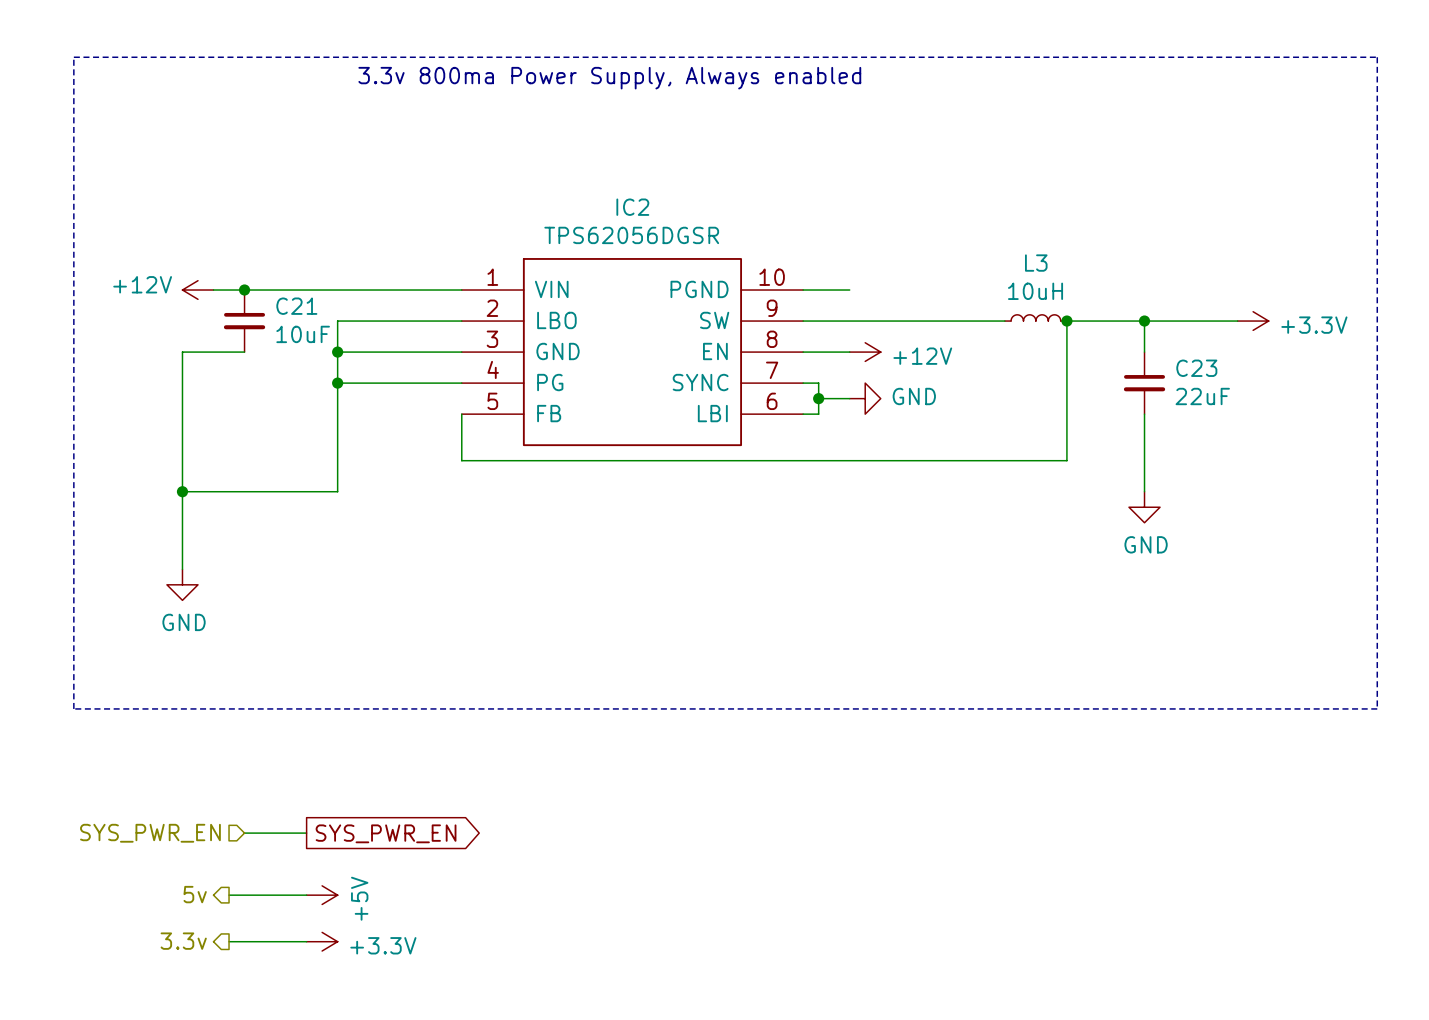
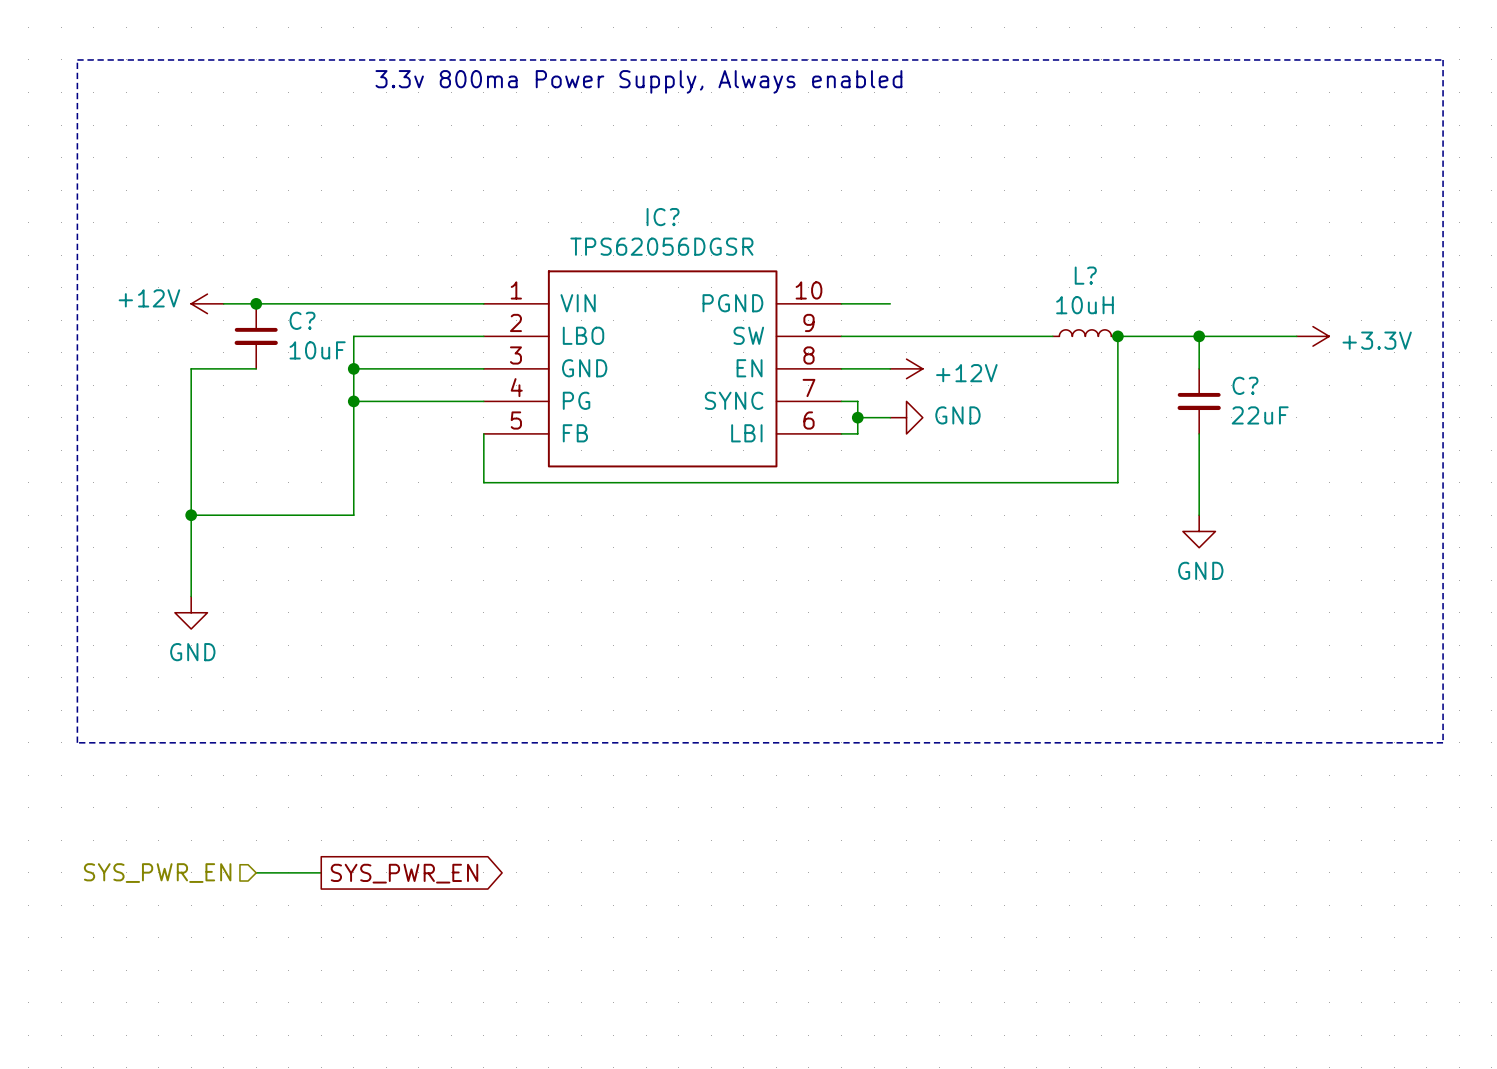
IC2 name: IC2 (632, 207) -> IC? (663, 217)
L3 name: L3 (1036, 263) -> L? (1085, 275)
C21 name: C21 (296, 306) -> C? (302, 320)
C23 name: C23 (1196, 368) -> C? (1245, 385)
hierarchical label: 5v (195, 894) -> none
wire: (229, 895) (306, 895) -> none
power symbol: +5V (322, 895) -> none
hierarchical label: 3.3v (183, 941) -> none
wire: (229, 941) (306, 941) -> none
power symbol: +3.3V (322, 941) -> none

